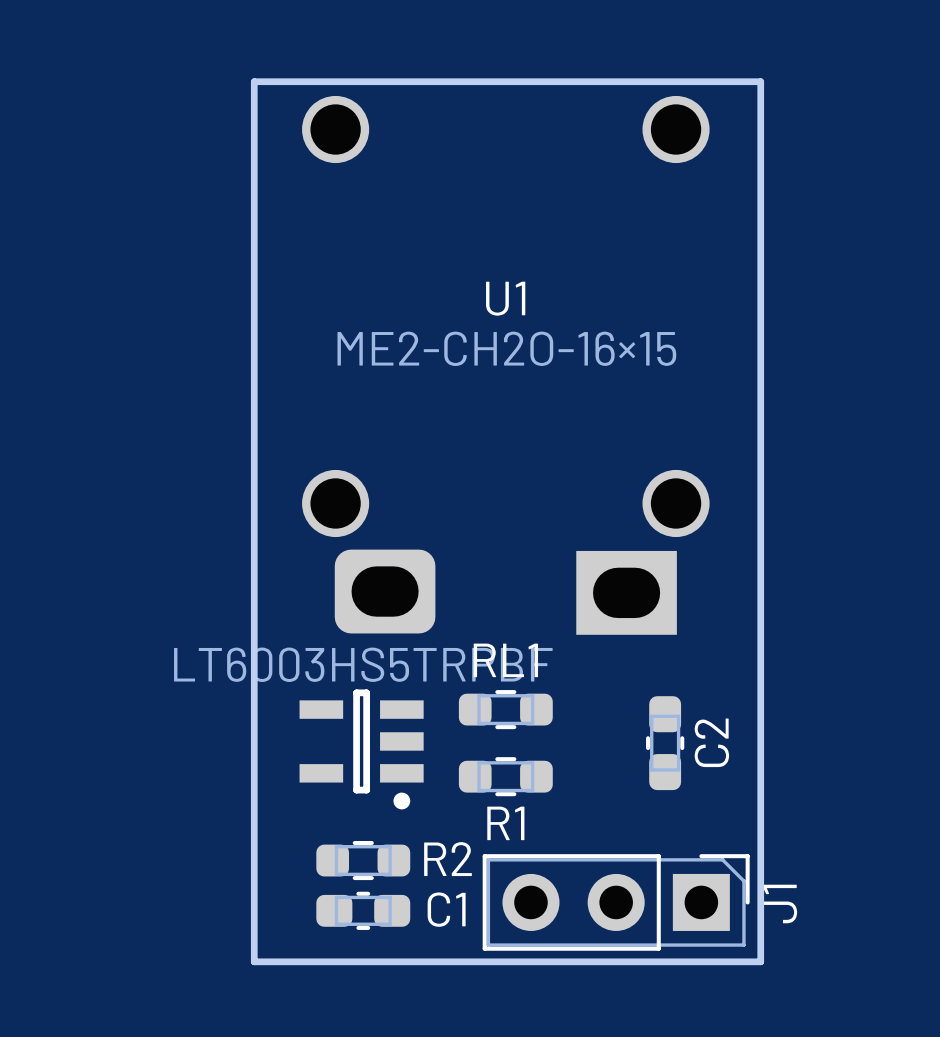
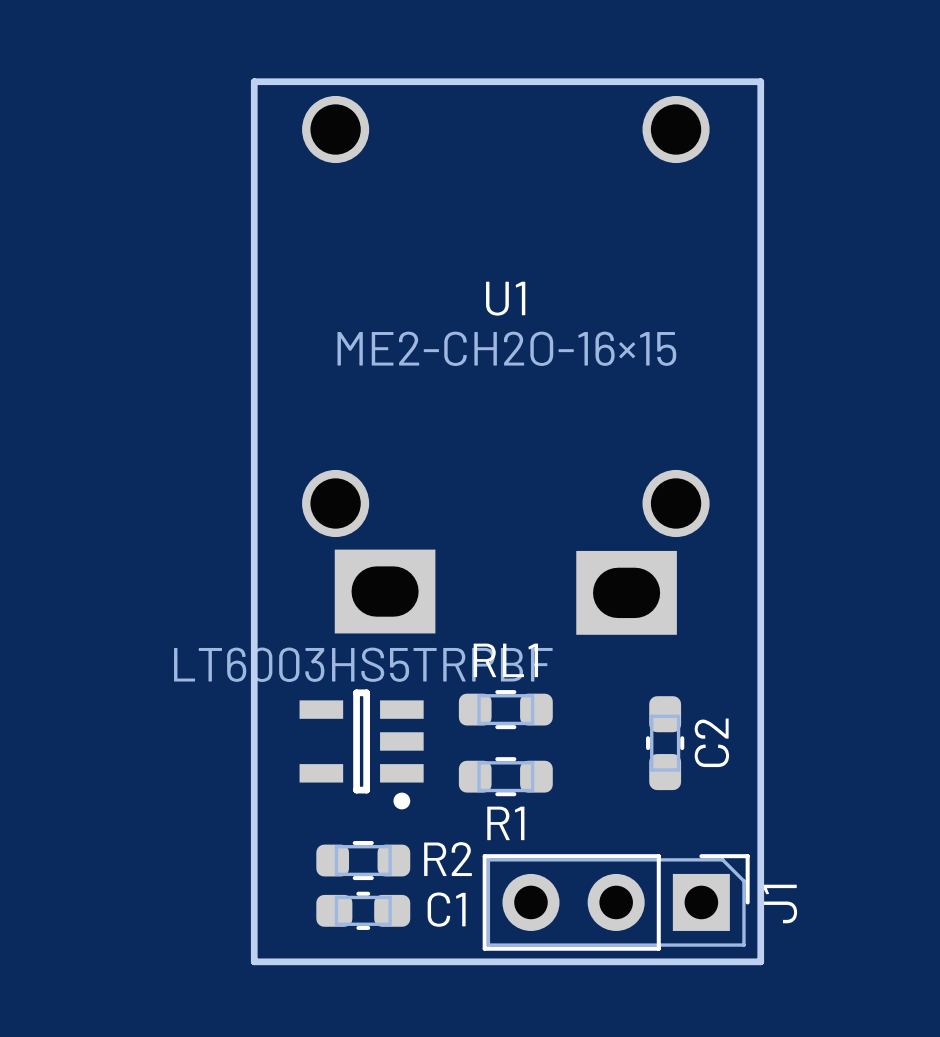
U1 footprint: [302, 95, 710, 635] -> [302, 95, 710, 635]

